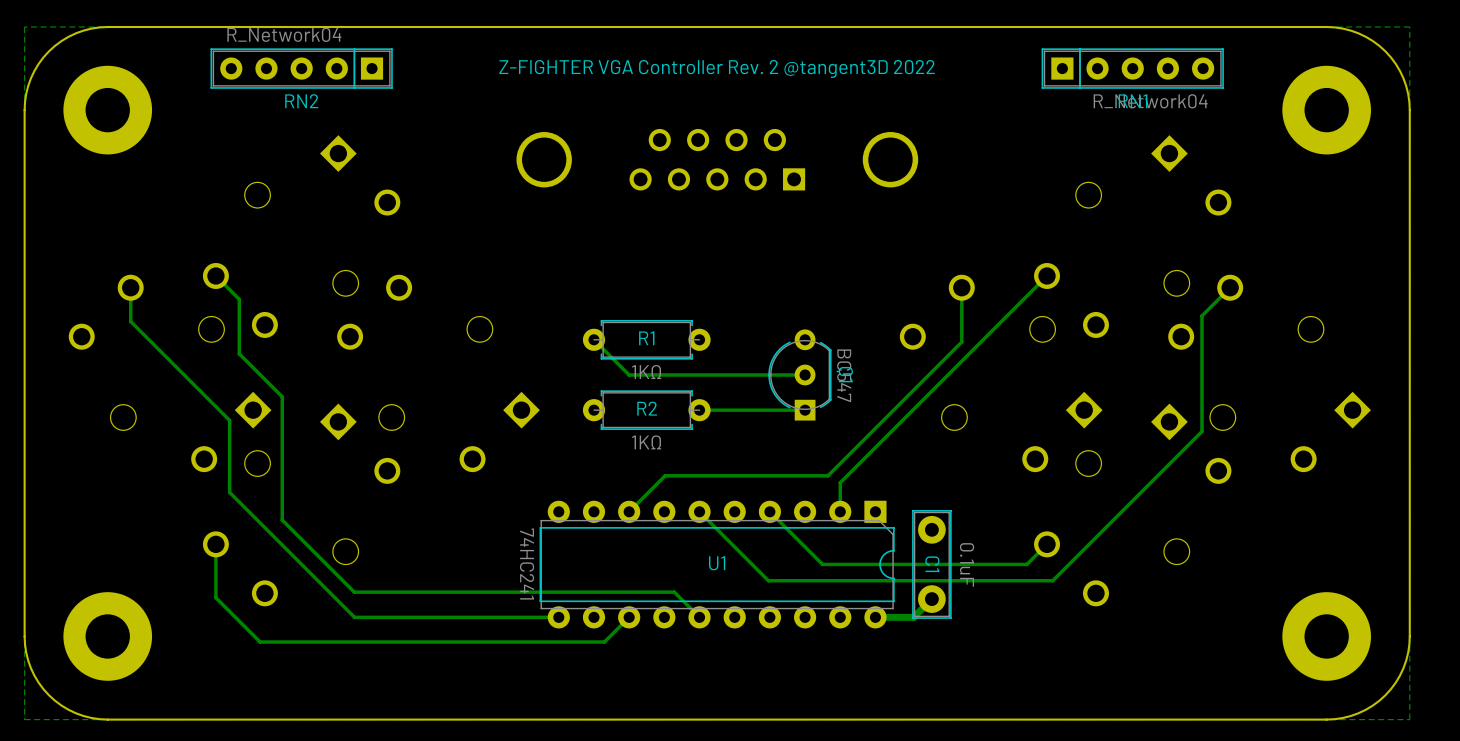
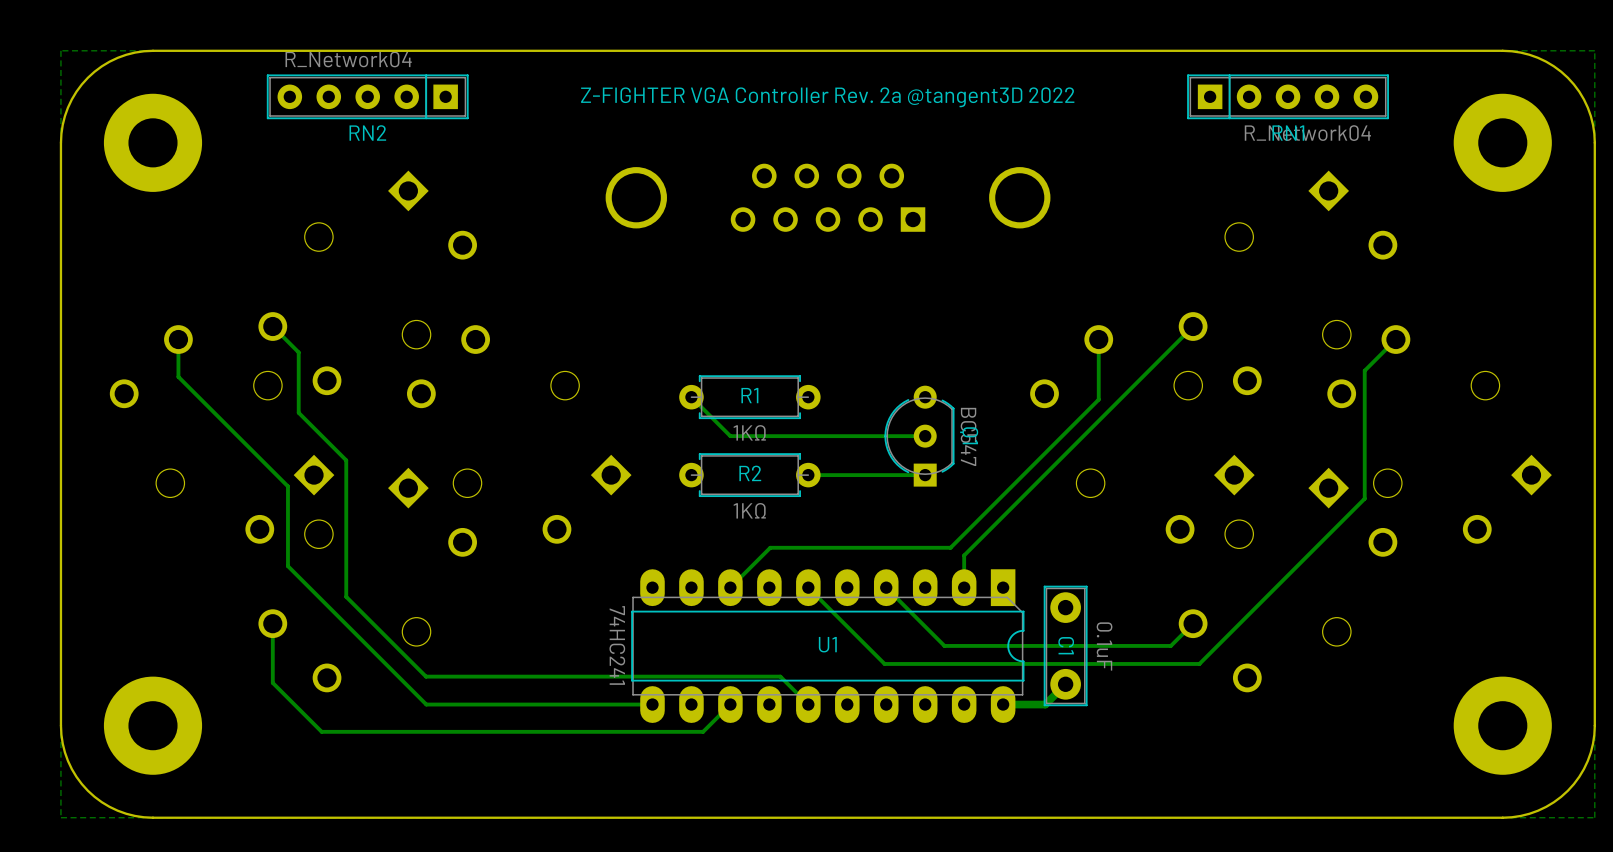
text: Z-FIGHTER VGA Controller Rev. 2 @tangent3D 2022 (717, 68) -> Z-FIGHTER VGA Controller Rev. 2a @tangent3D 2022 (827, 97)
U1 footprint: [539, 500, 895, 629] -> [631, 569, 1025, 723]

